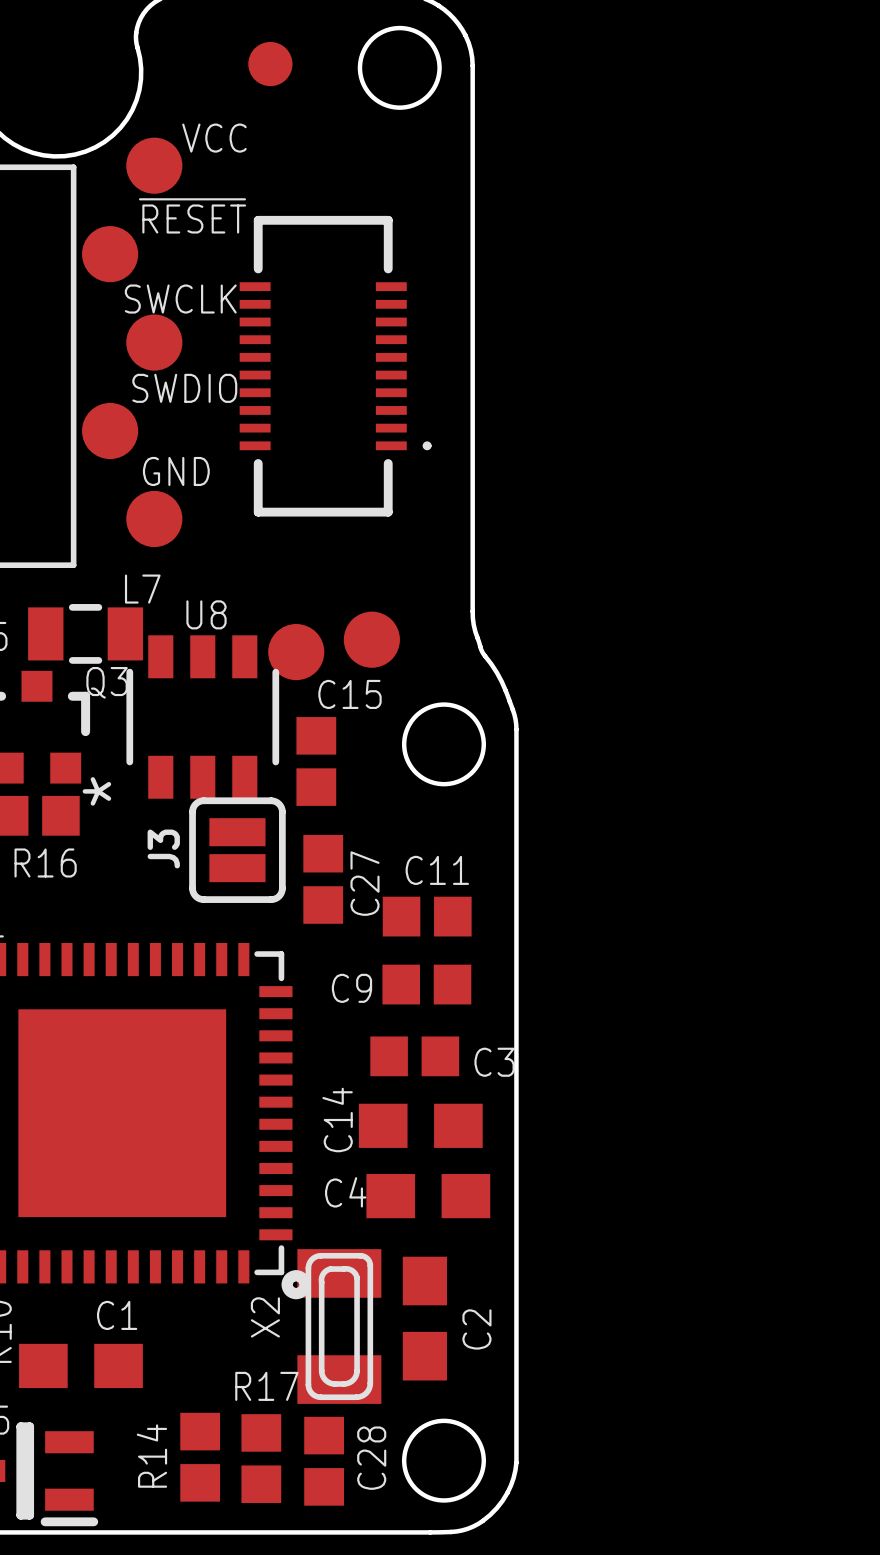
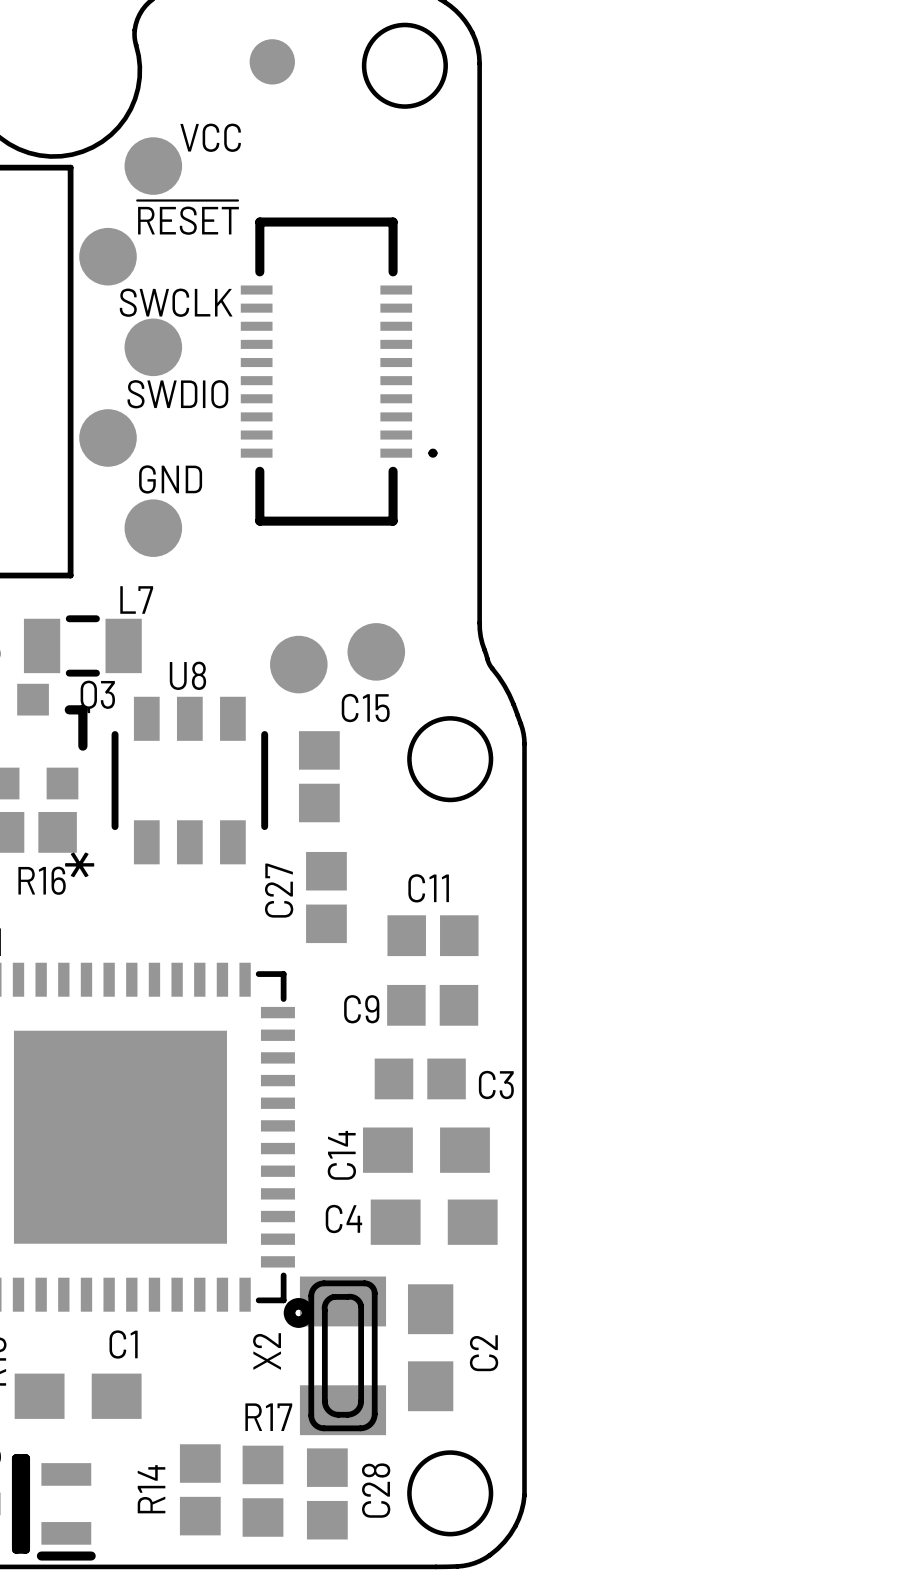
U8 position: (202, 717) -> (189, 780)
J3: (237, 850) -> none
C27 name position: C27 (365, 883) -> C27 (279, 890)

